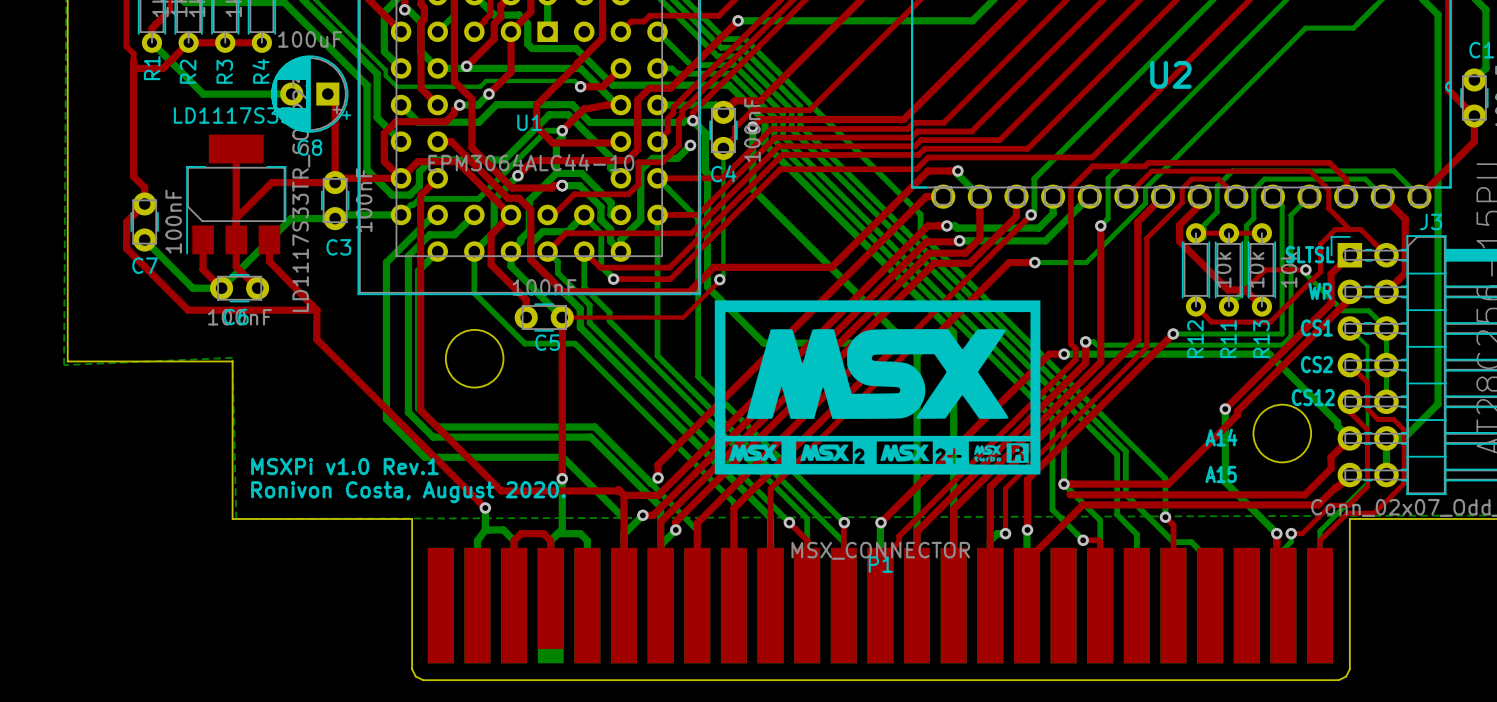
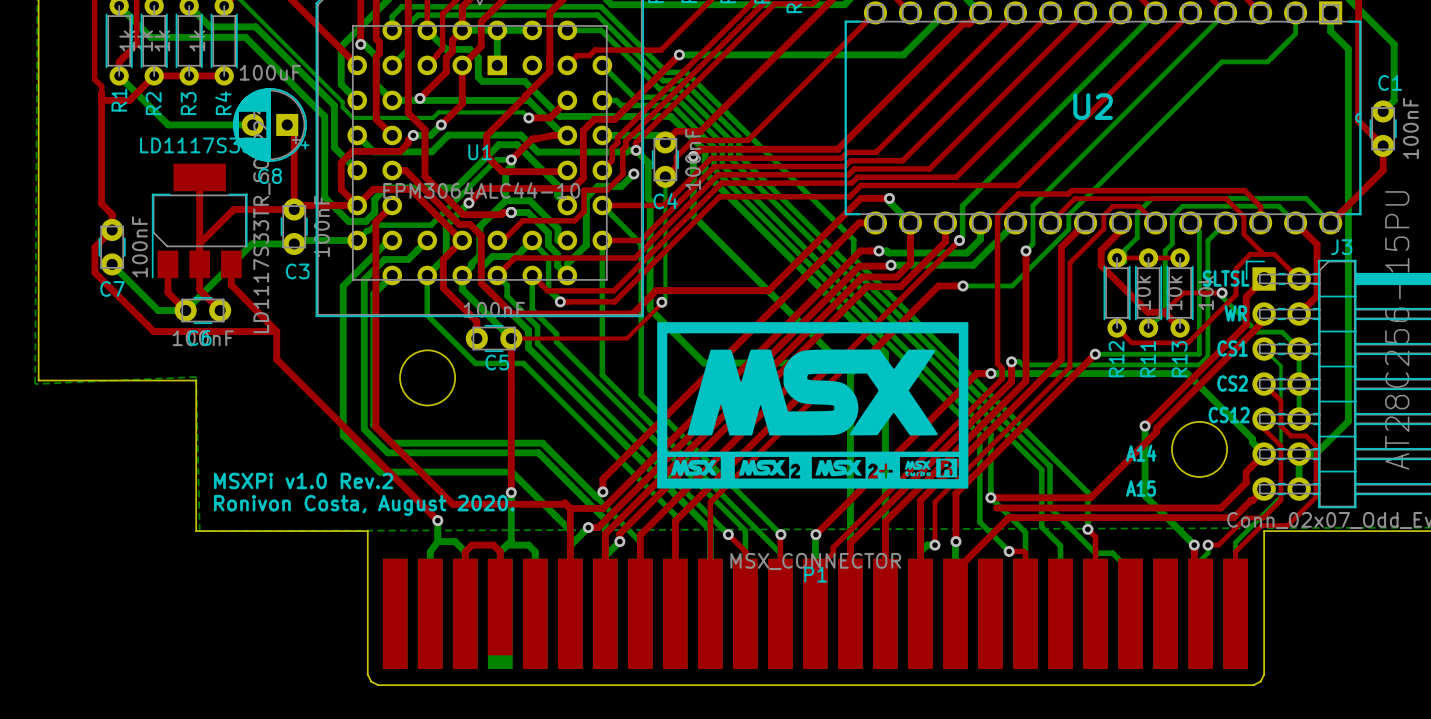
text: MSXPi v1.0 Rev.1 (344, 466) -> MSXPi v1.0 Rev.2 (303, 480)

